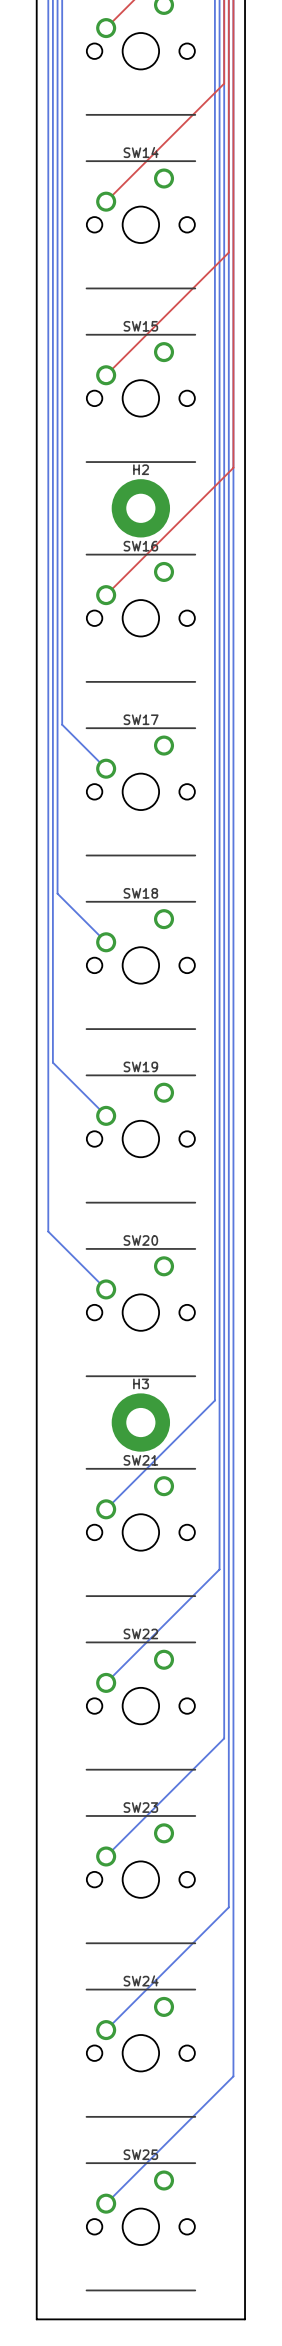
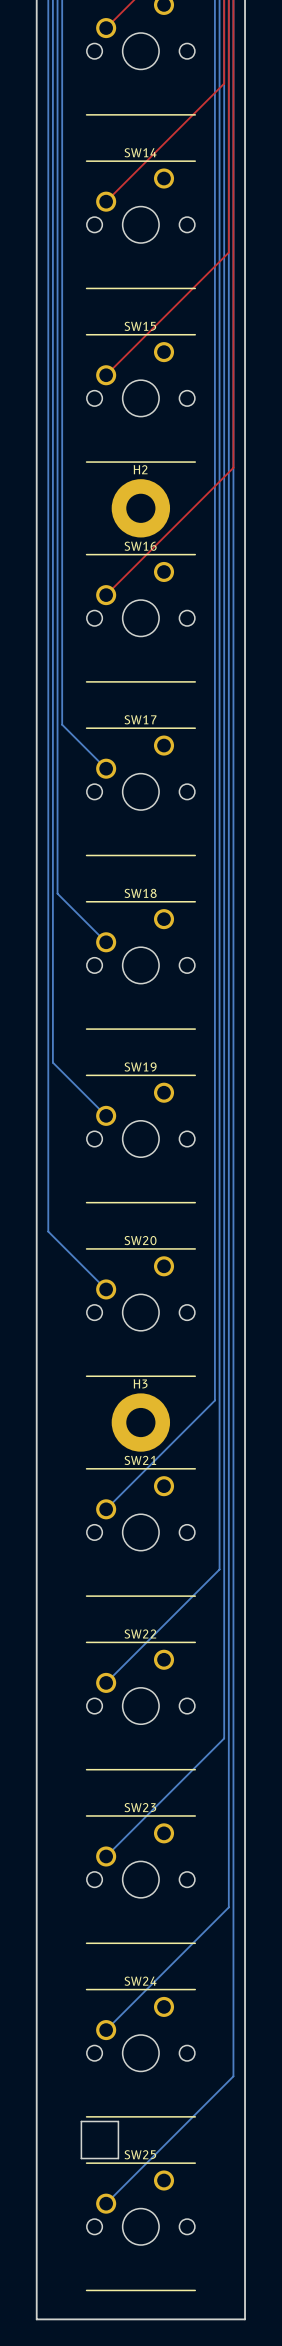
board edge: none -> (81, 2121) (118, 2121) (118, 2158) (81, 2158) (81, 2121)

